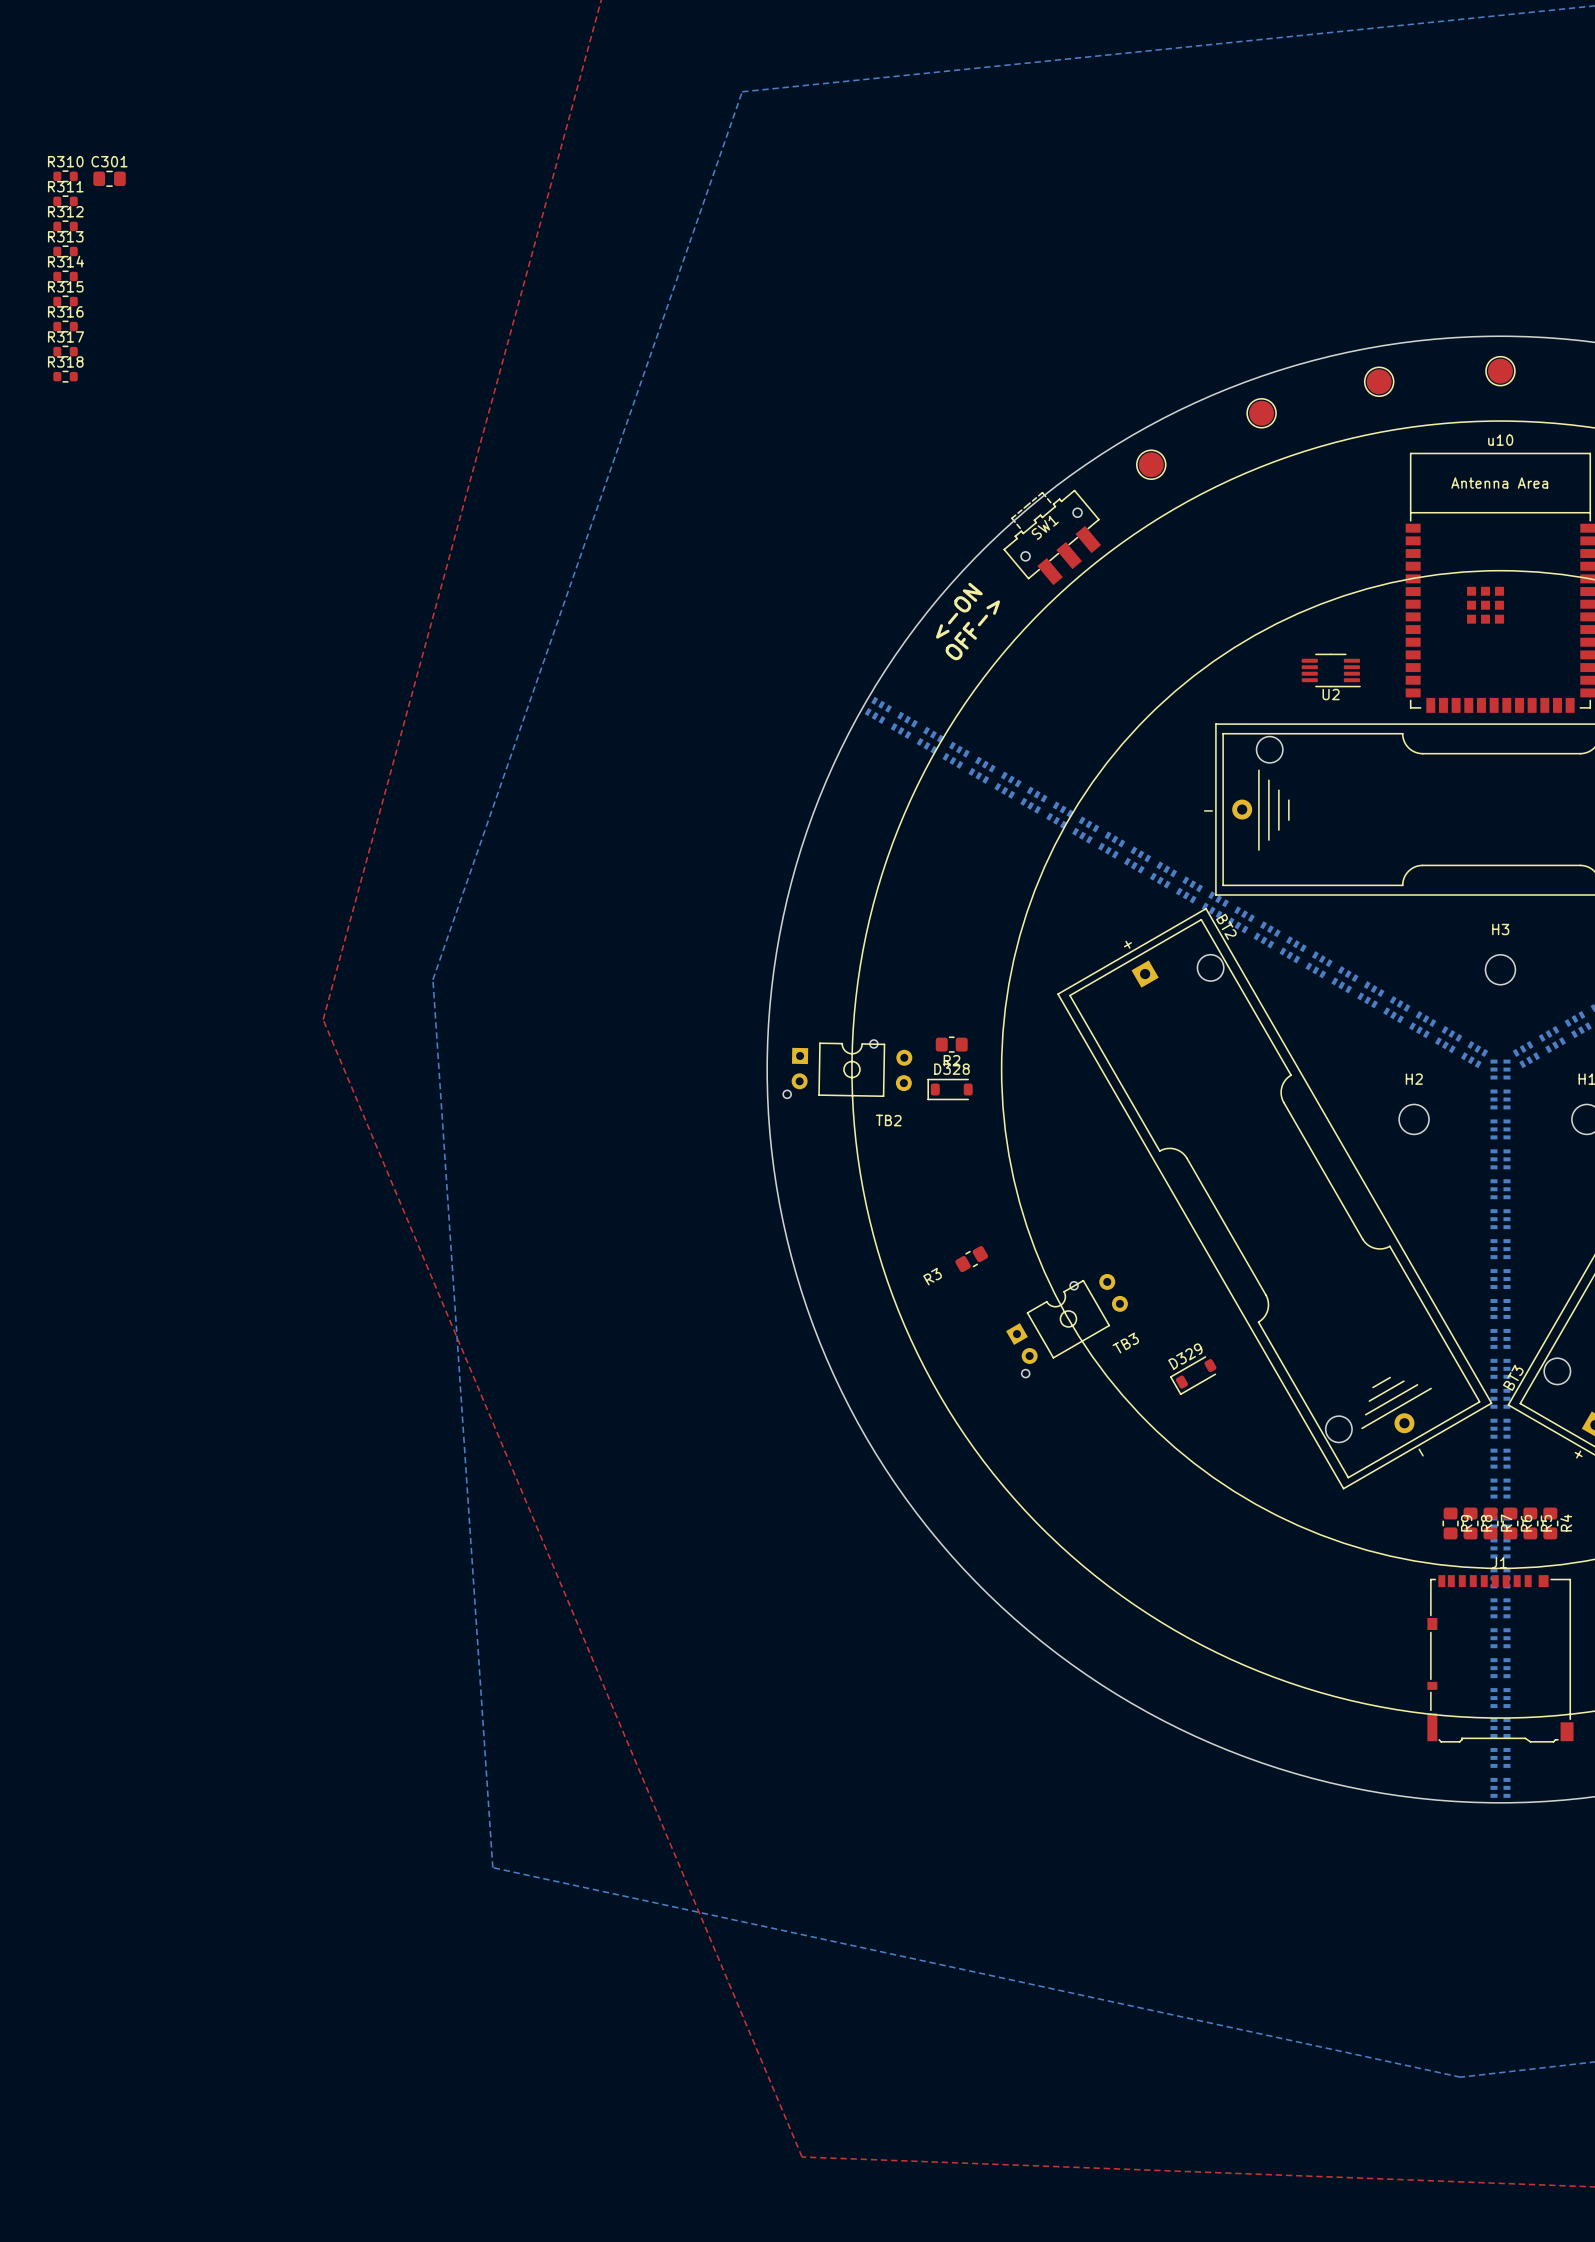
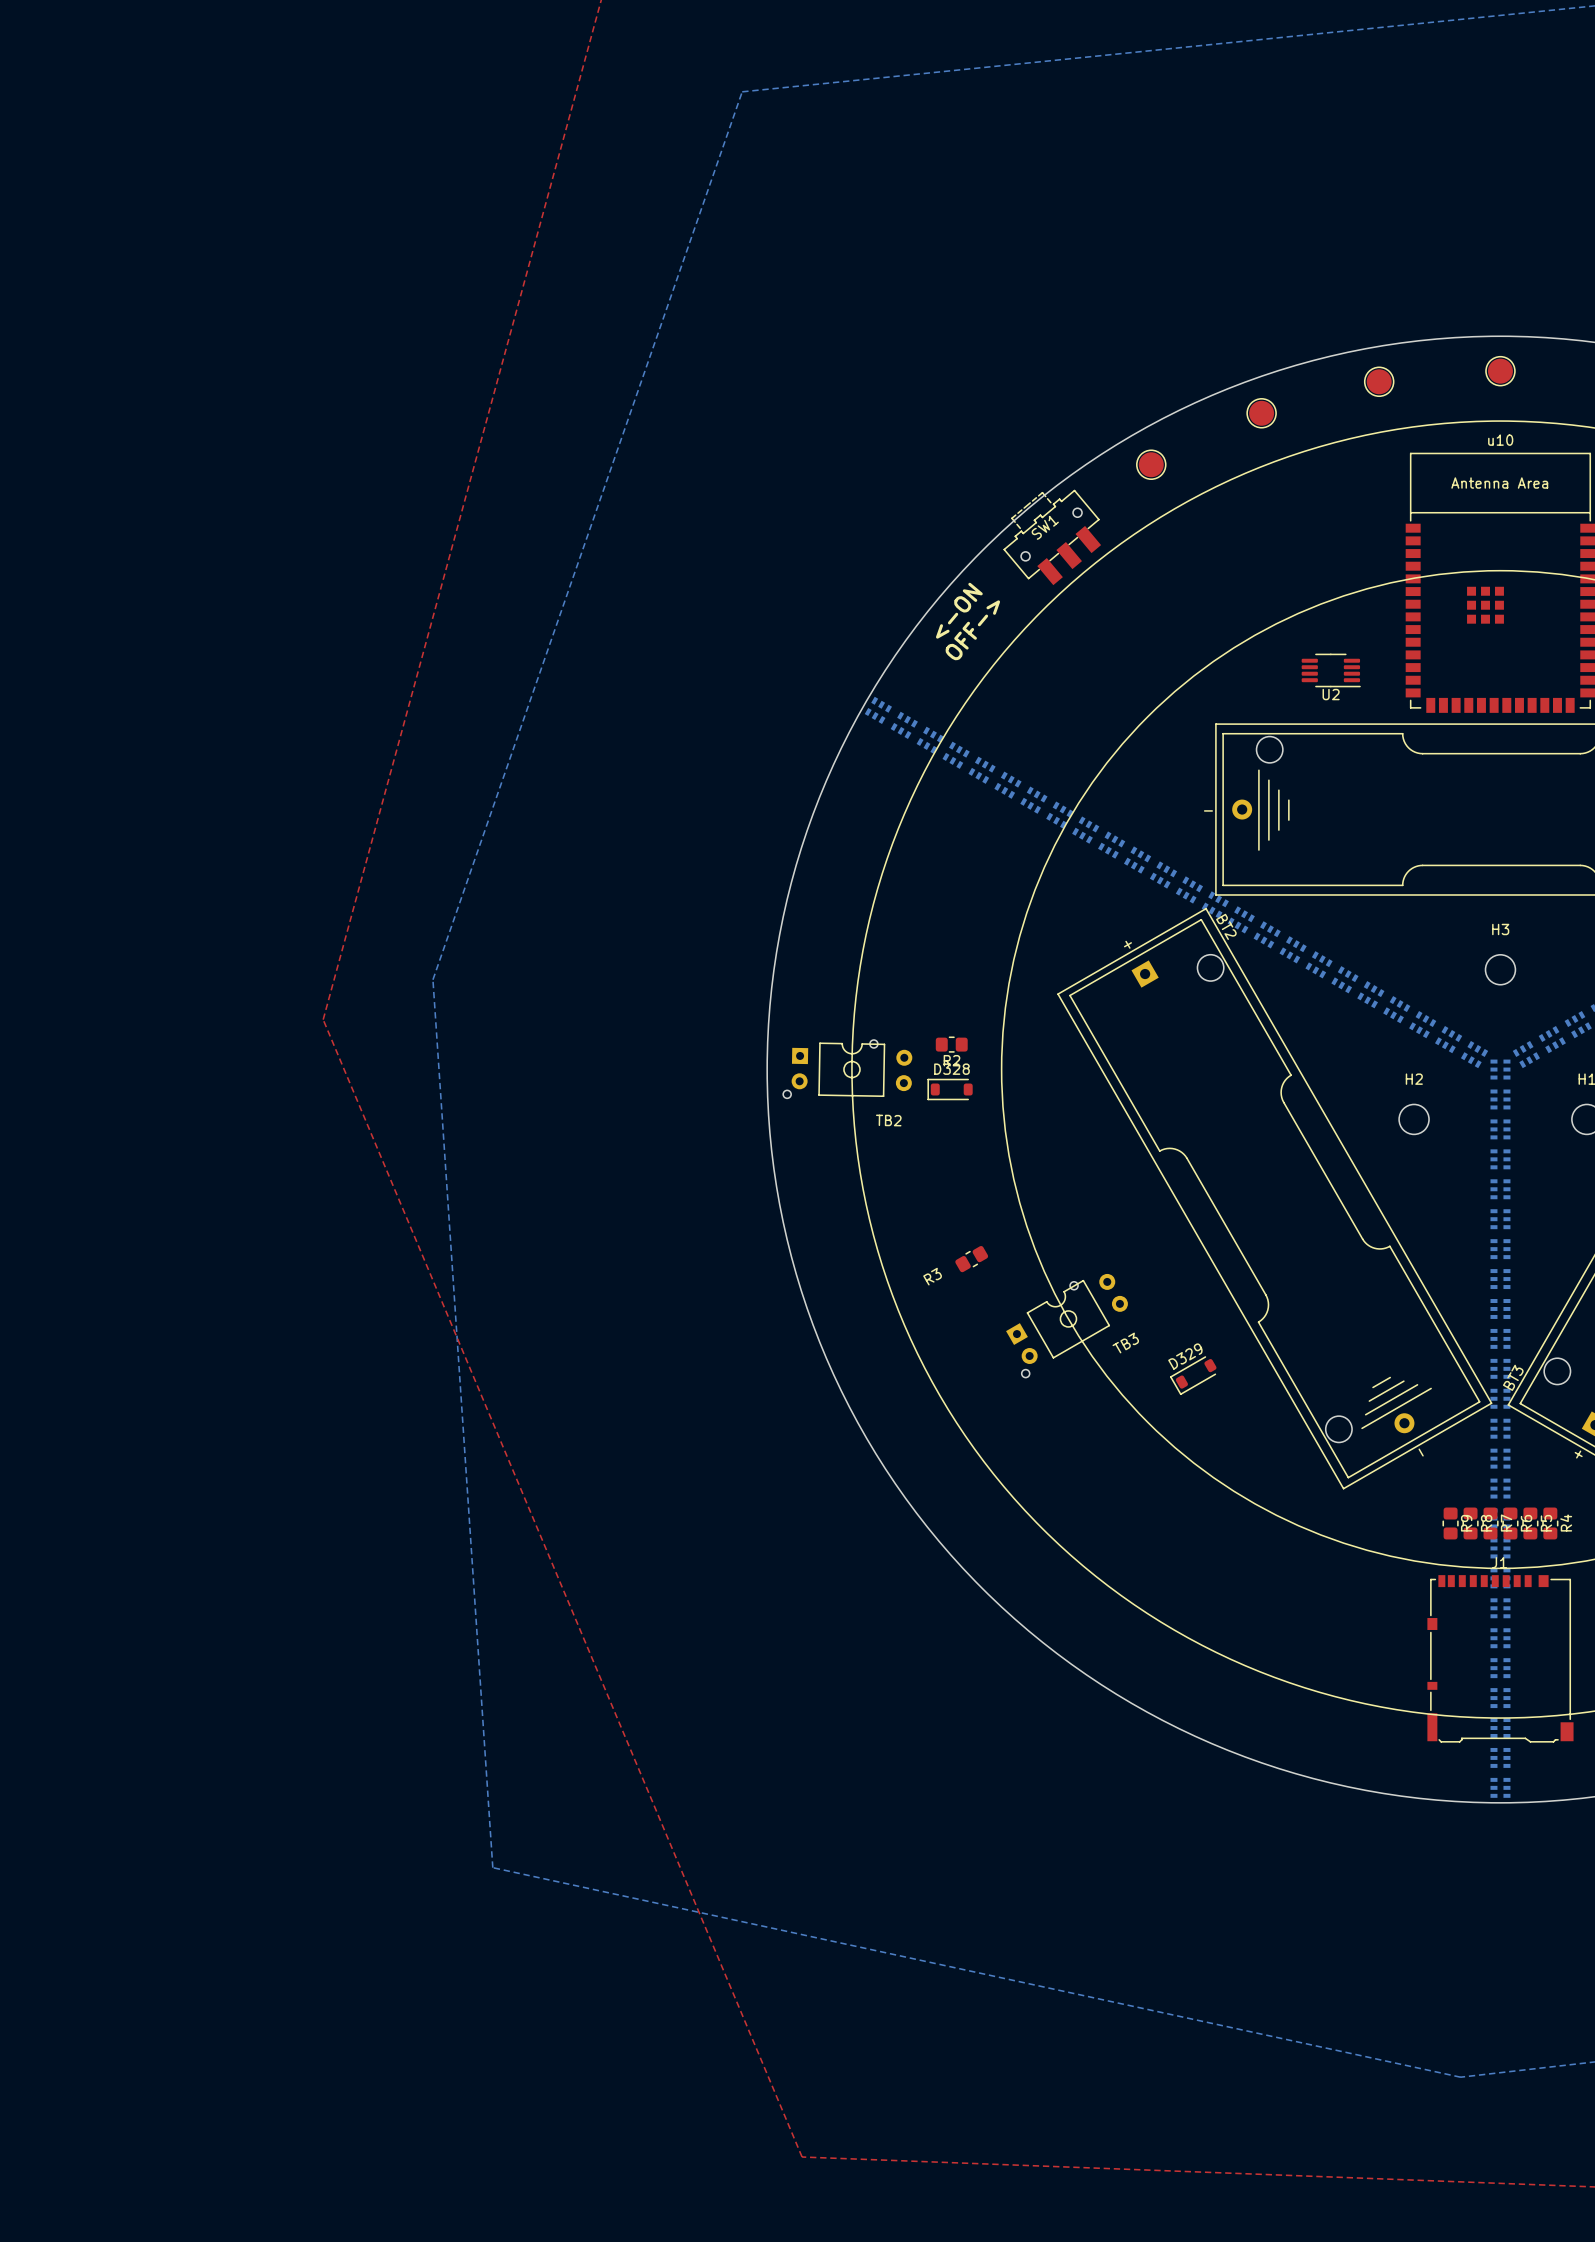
R310: (65, 176) -> none
C301: (109, 178) -> none
R311: (65, 201) -> none
R312: (65, 226) -> none
R313: (65, 251) -> none
R314: (65, 276) -> none
R315: (65, 301) -> none
R316: (65, 326) -> none
R317: (65, 351) -> none
R318: (65, 376) -> none

